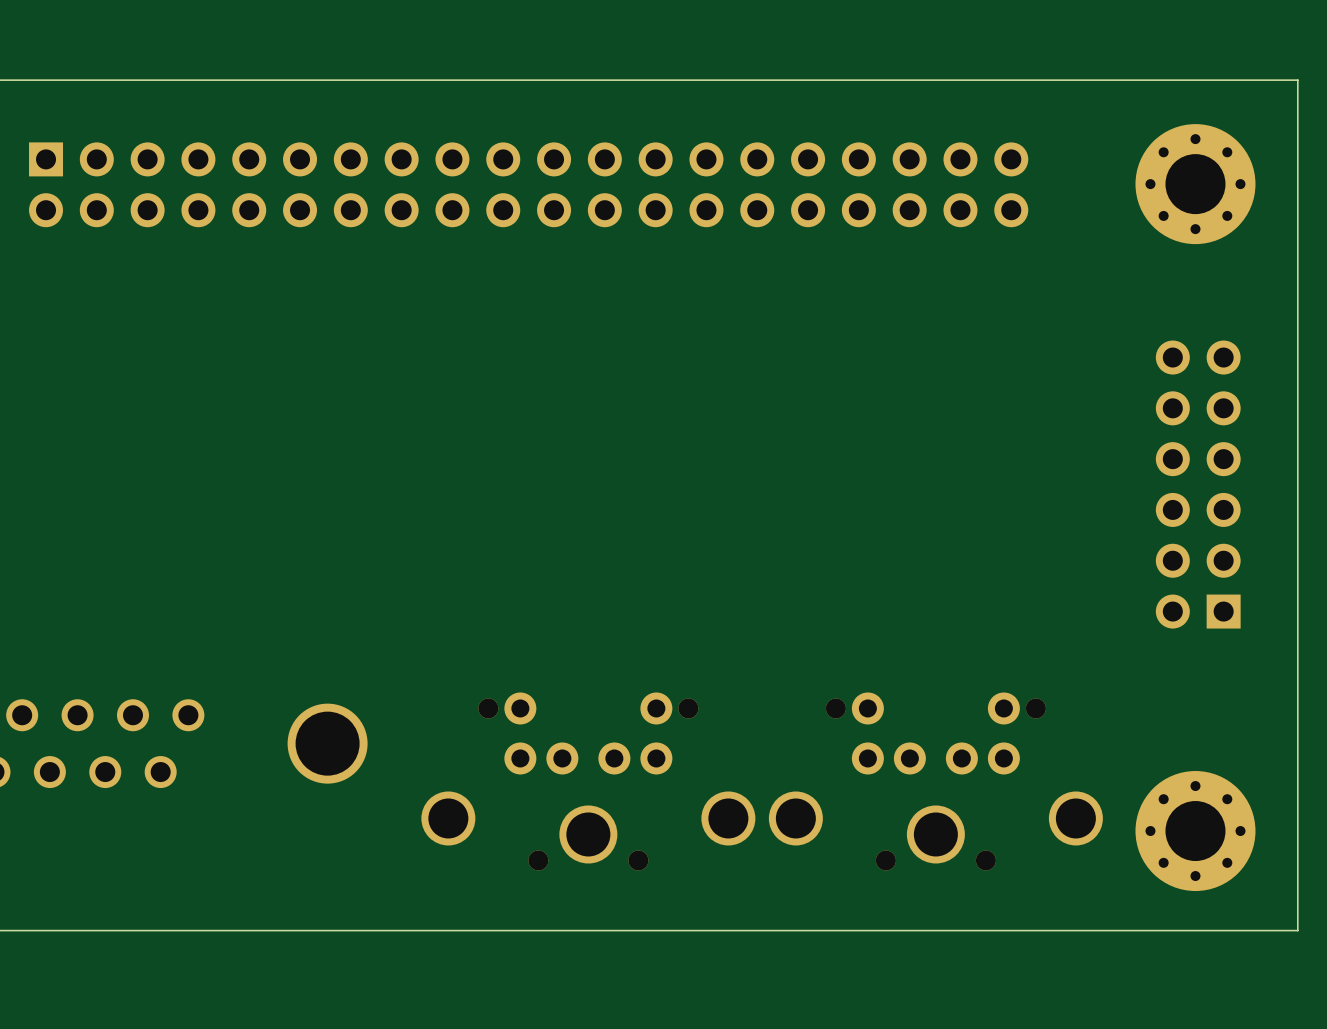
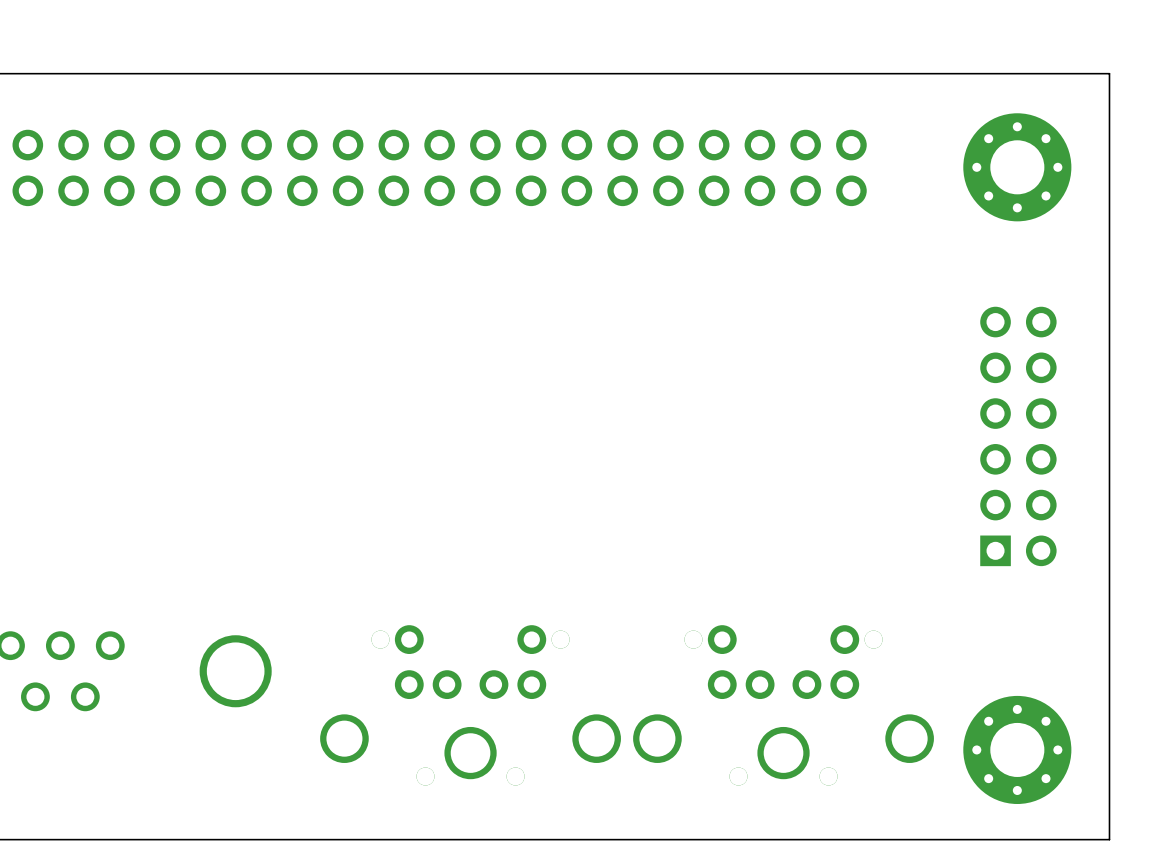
part footprint: [1155, 340, 1241, 629] -> [980, 306, 1057, 567]

